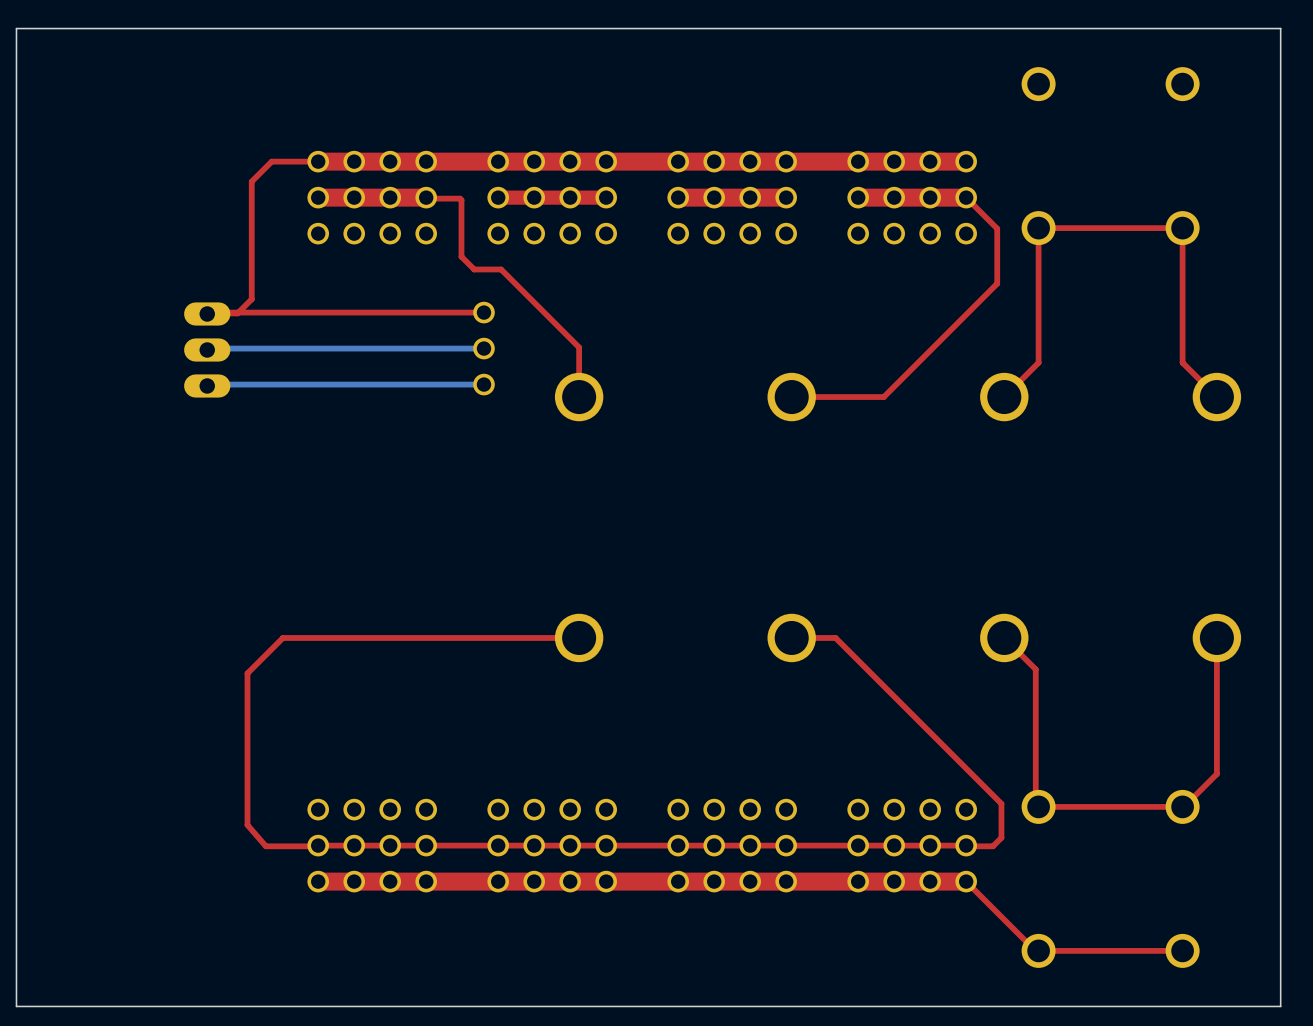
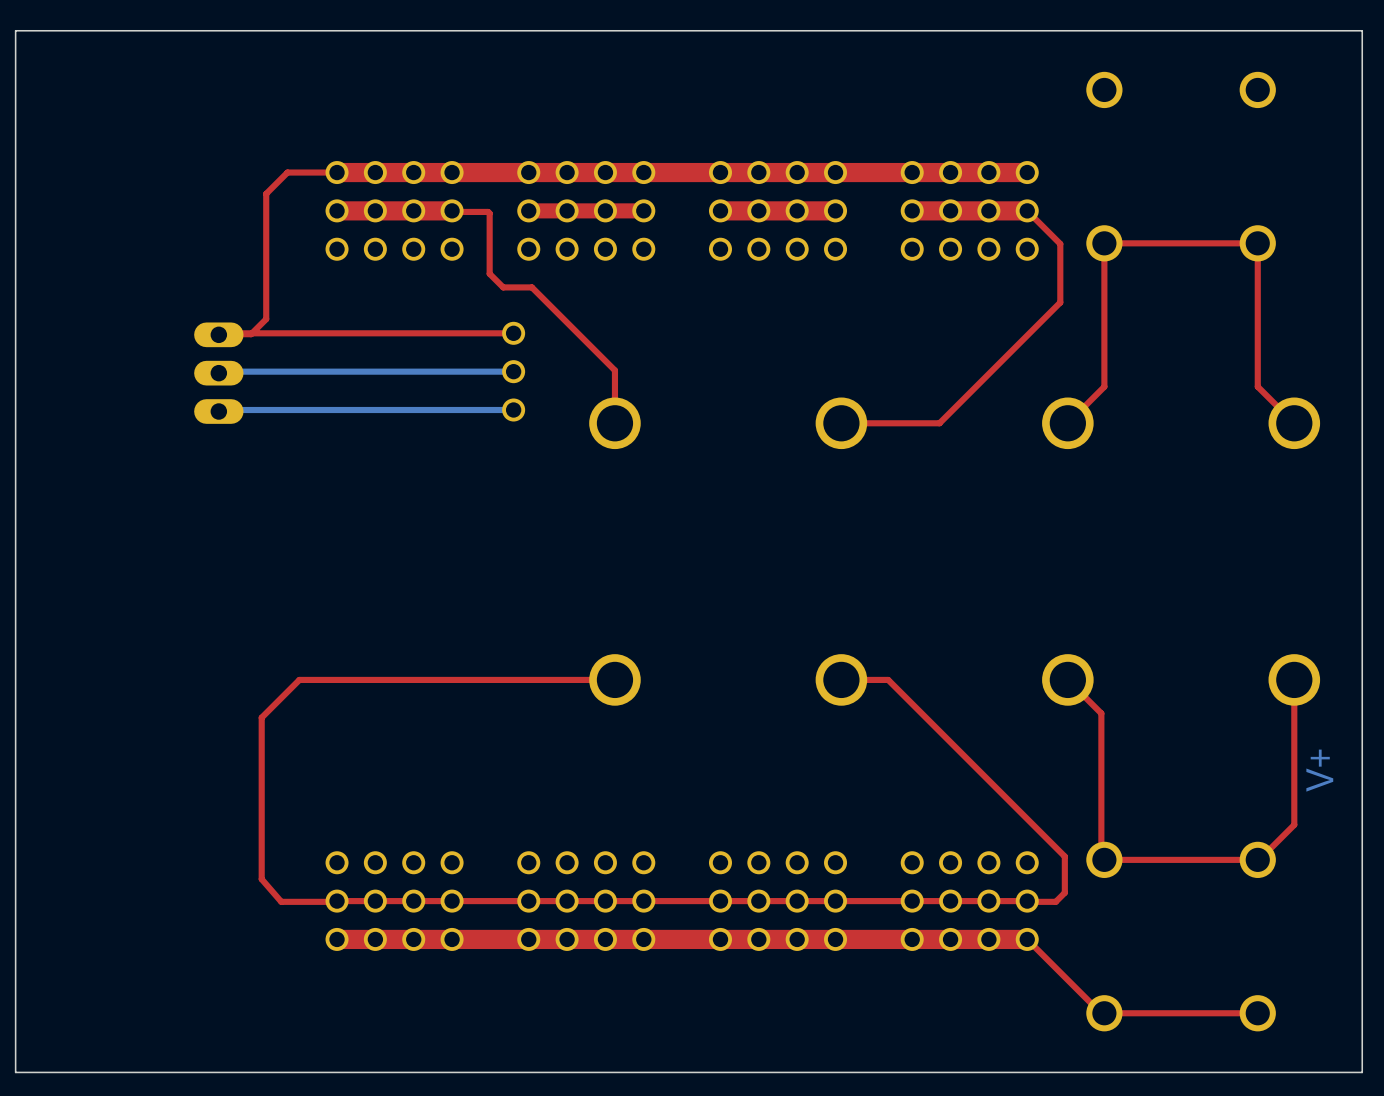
text: none -> V+ (1319, 770)

